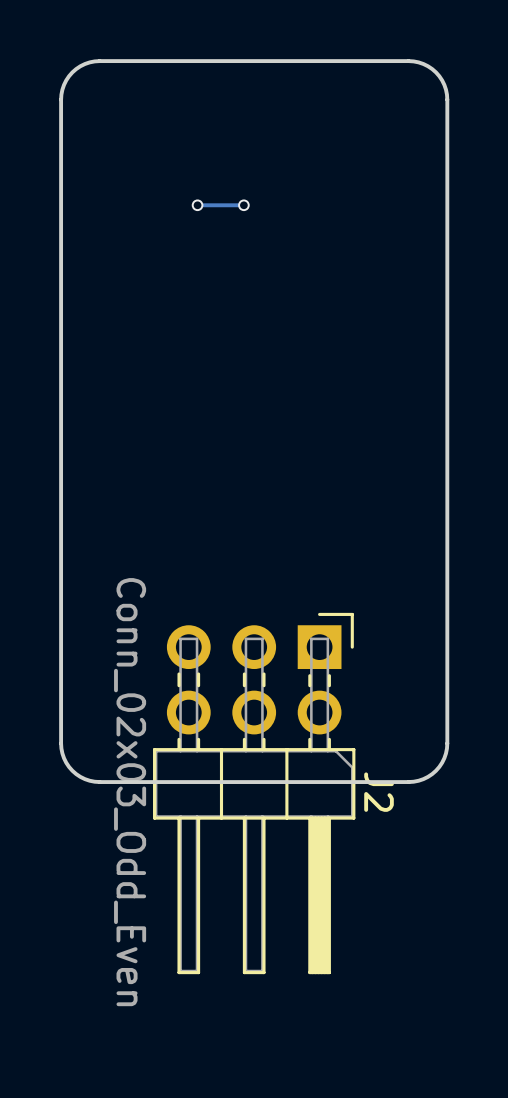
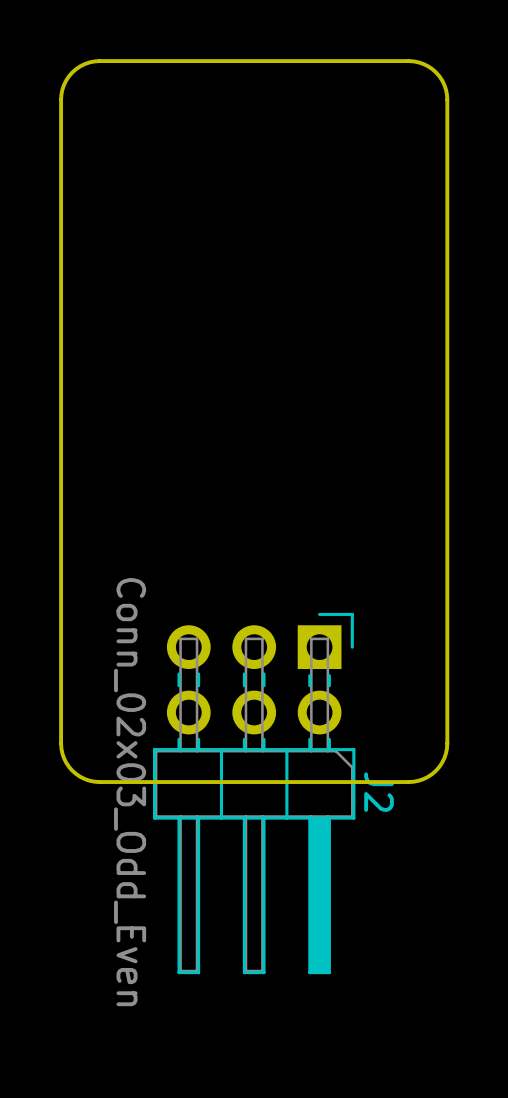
via: (197, 205) -> none
track: (243, 205) (197, 205) -> none
via: (243, 205) -> none

